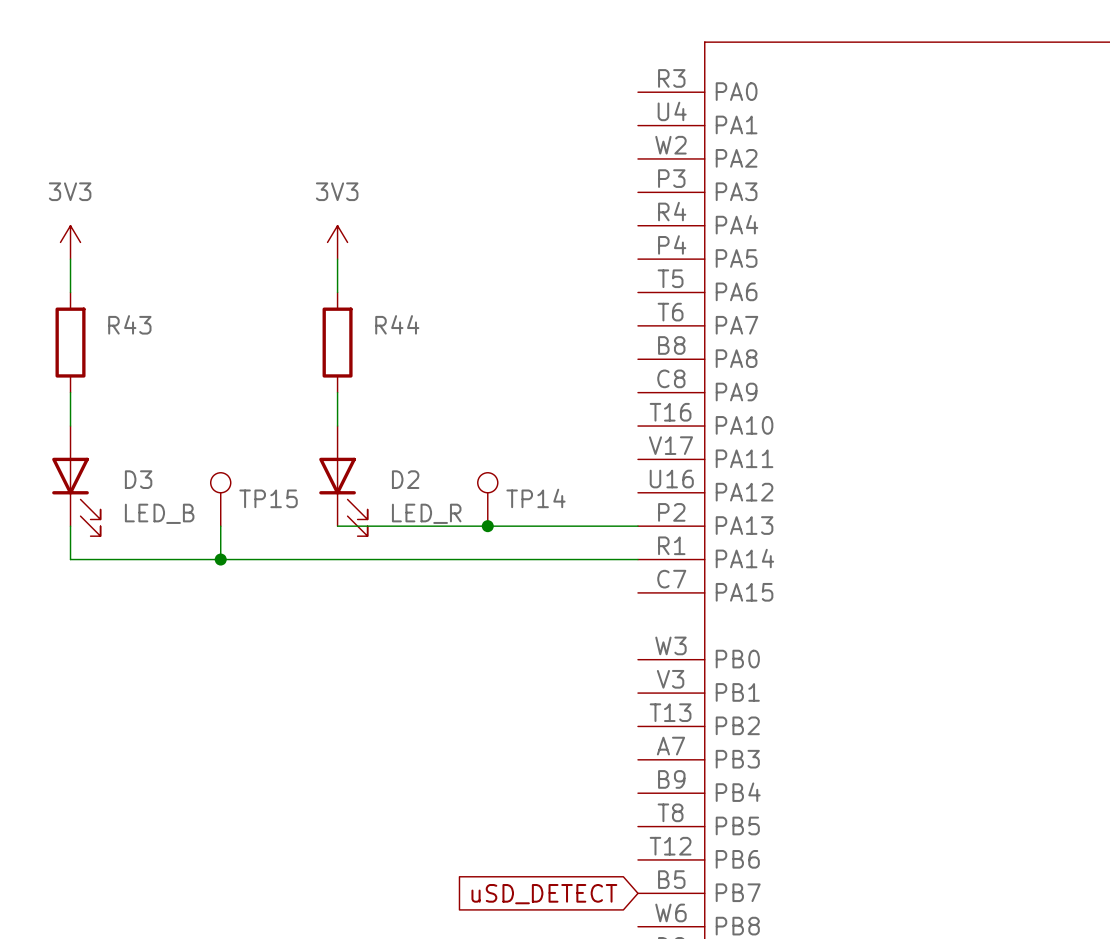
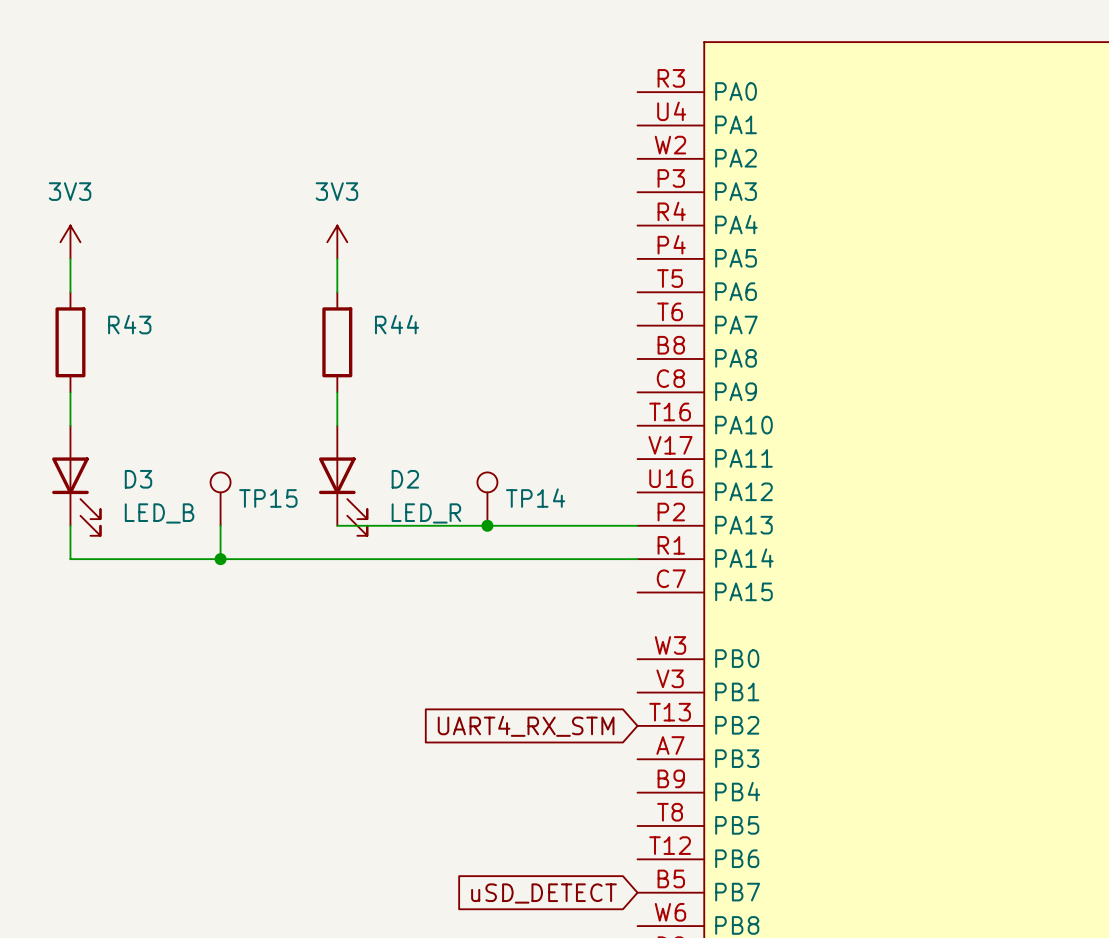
global label: none -> UART4_RX_STM (526, 726)

